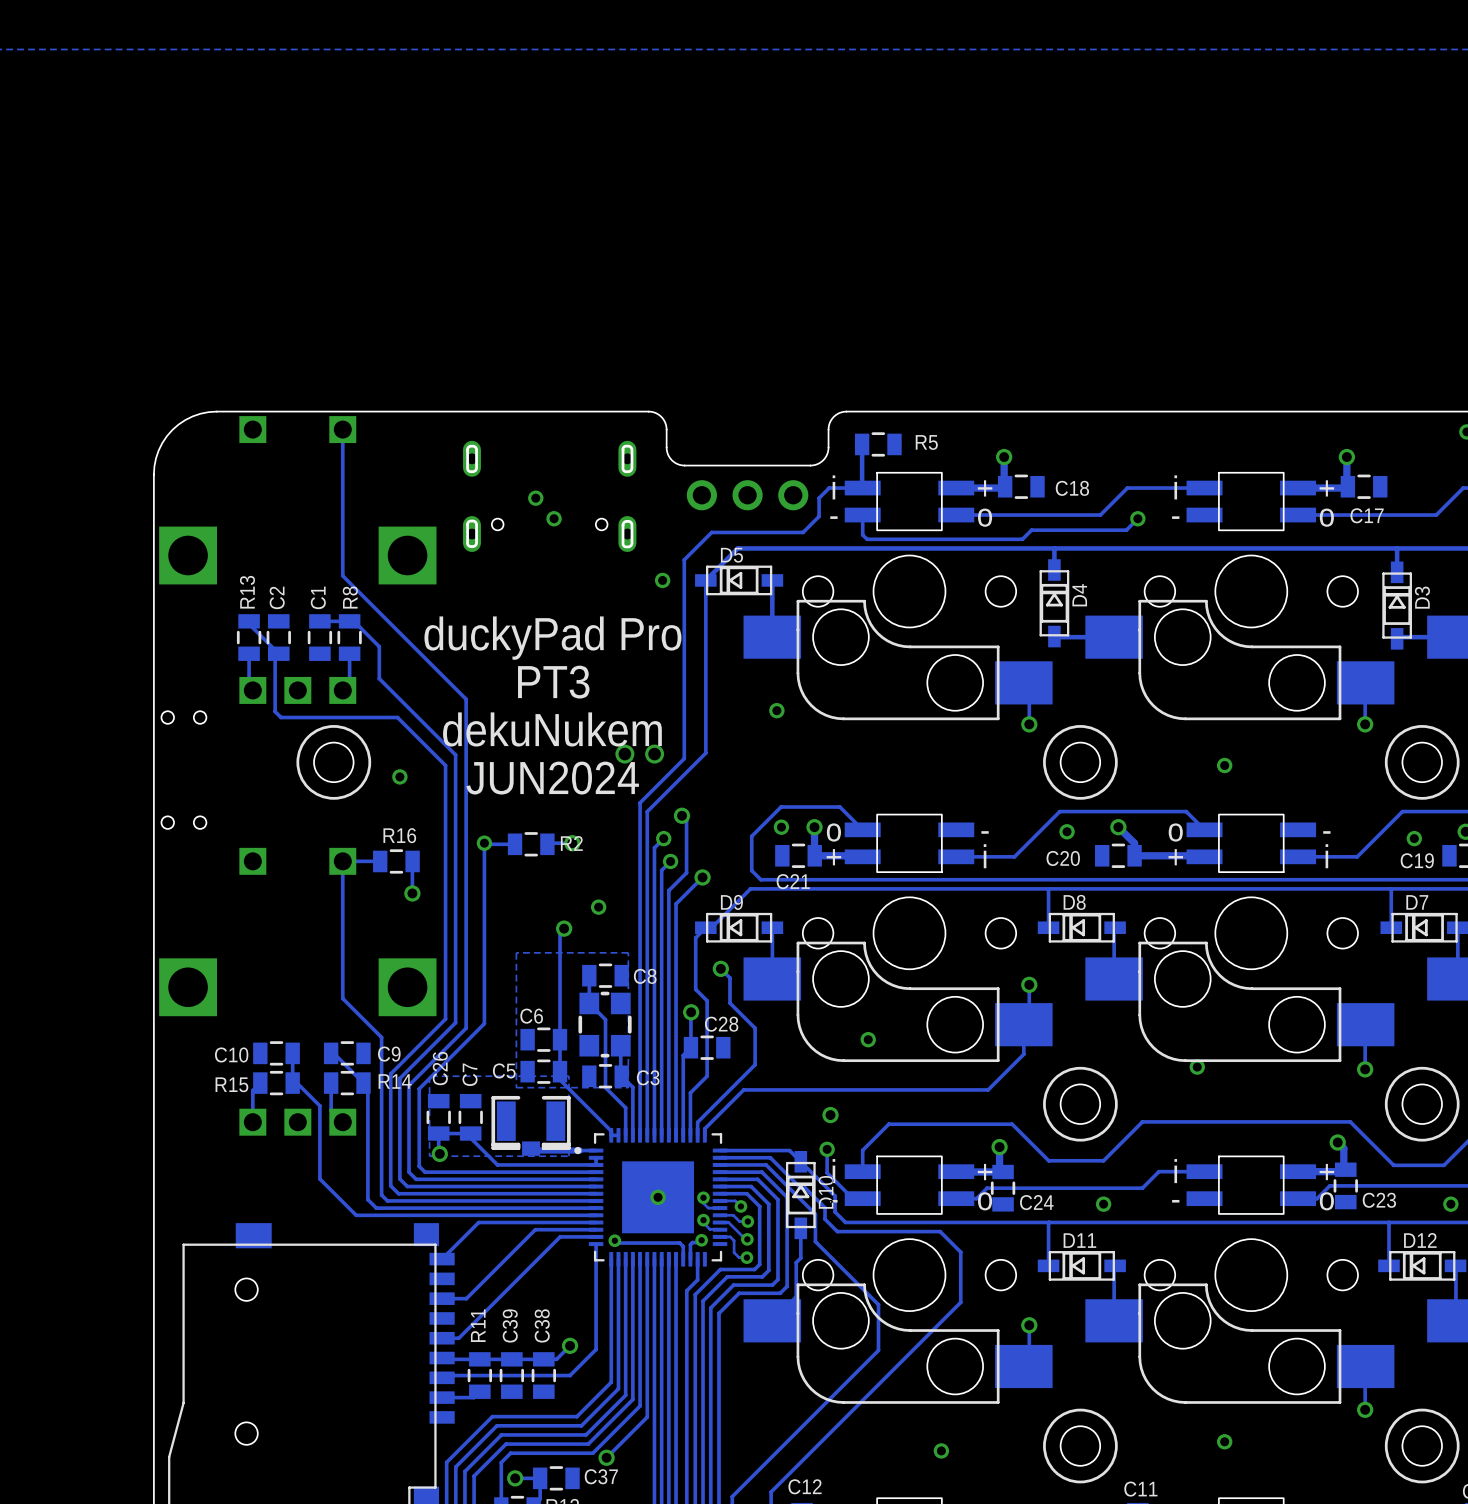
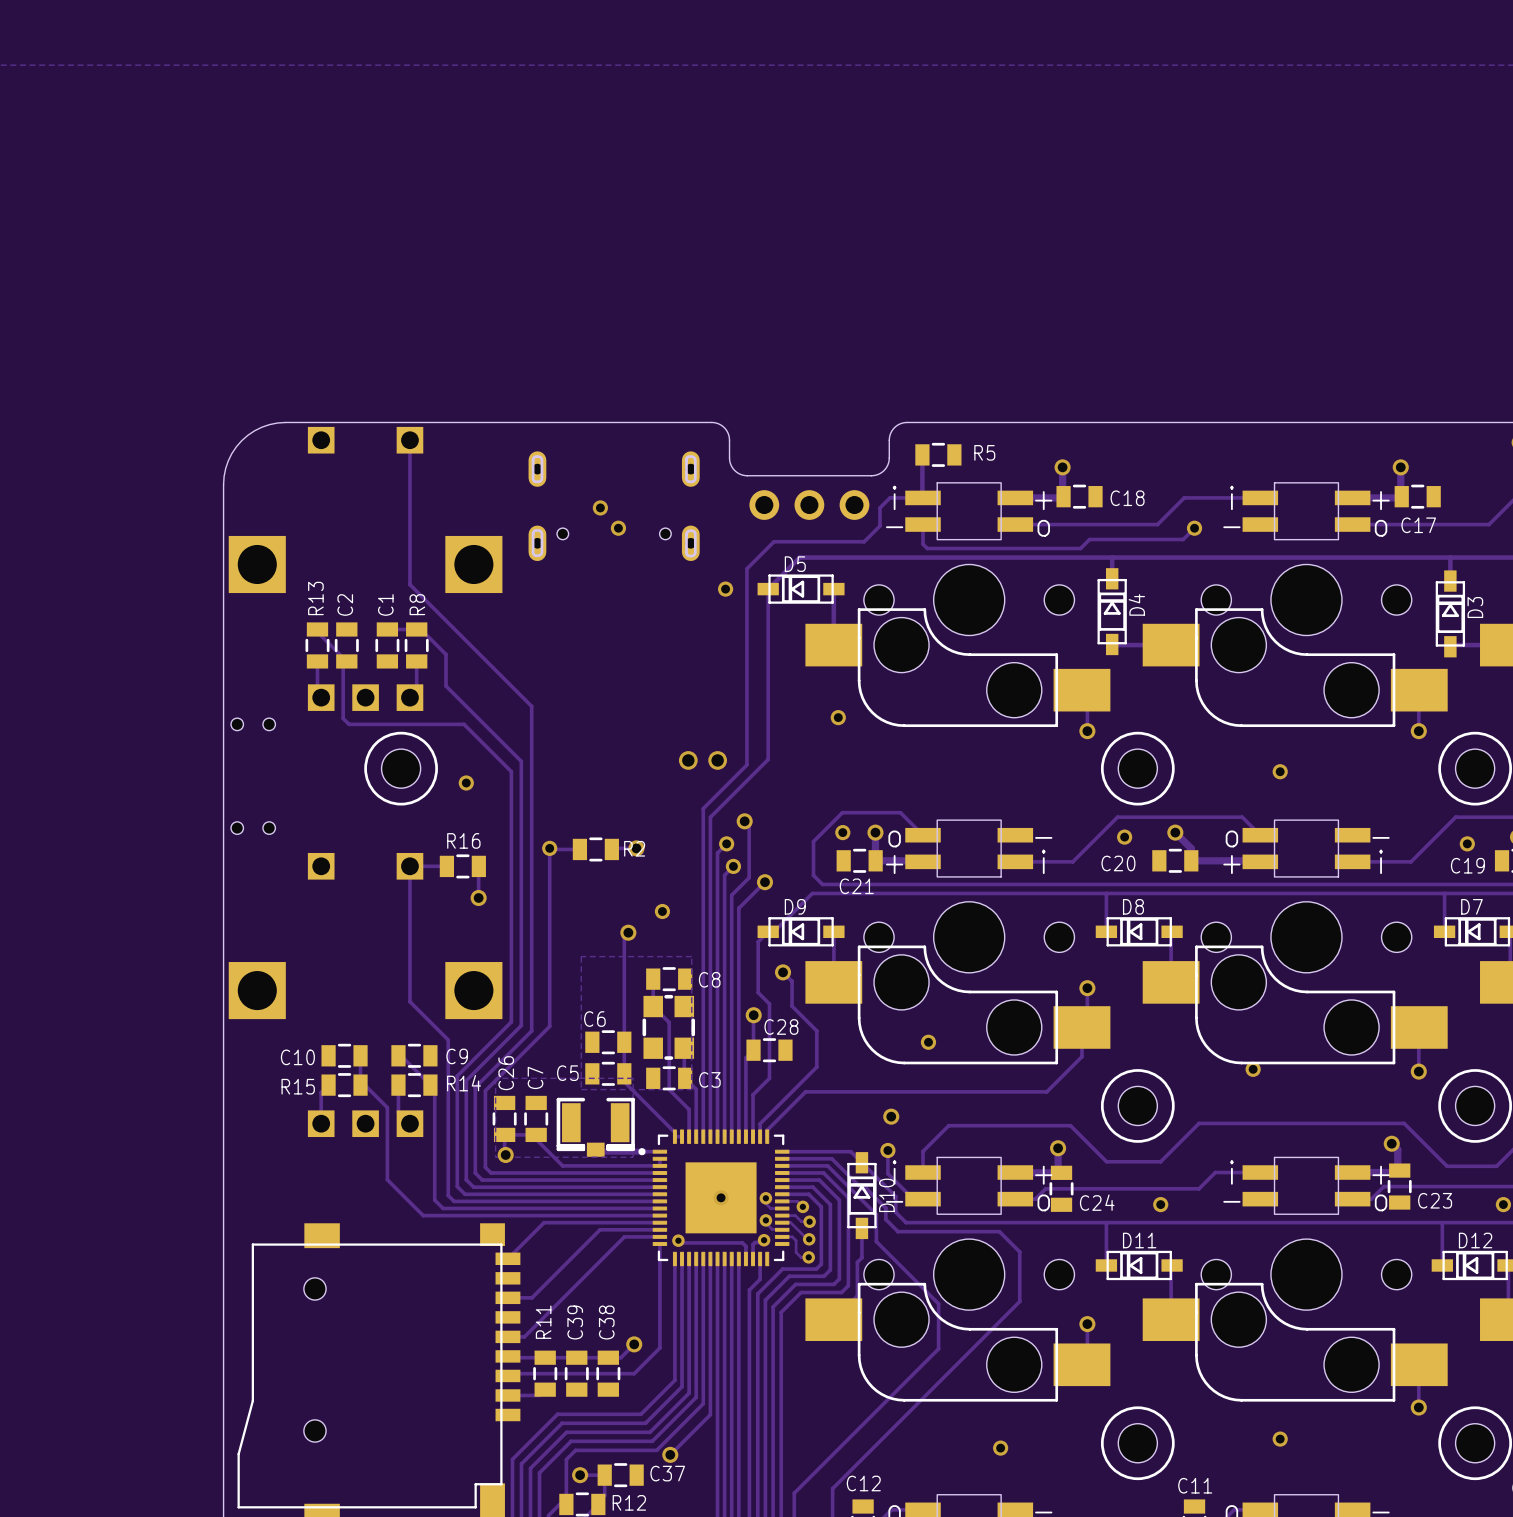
text: duckyPad Pro (552, 638) -> none
text: PT3 (553, 682) -> none
text: dekuNukem (552, 729) -> none
text: JUN2024 (552, 778) -> none

